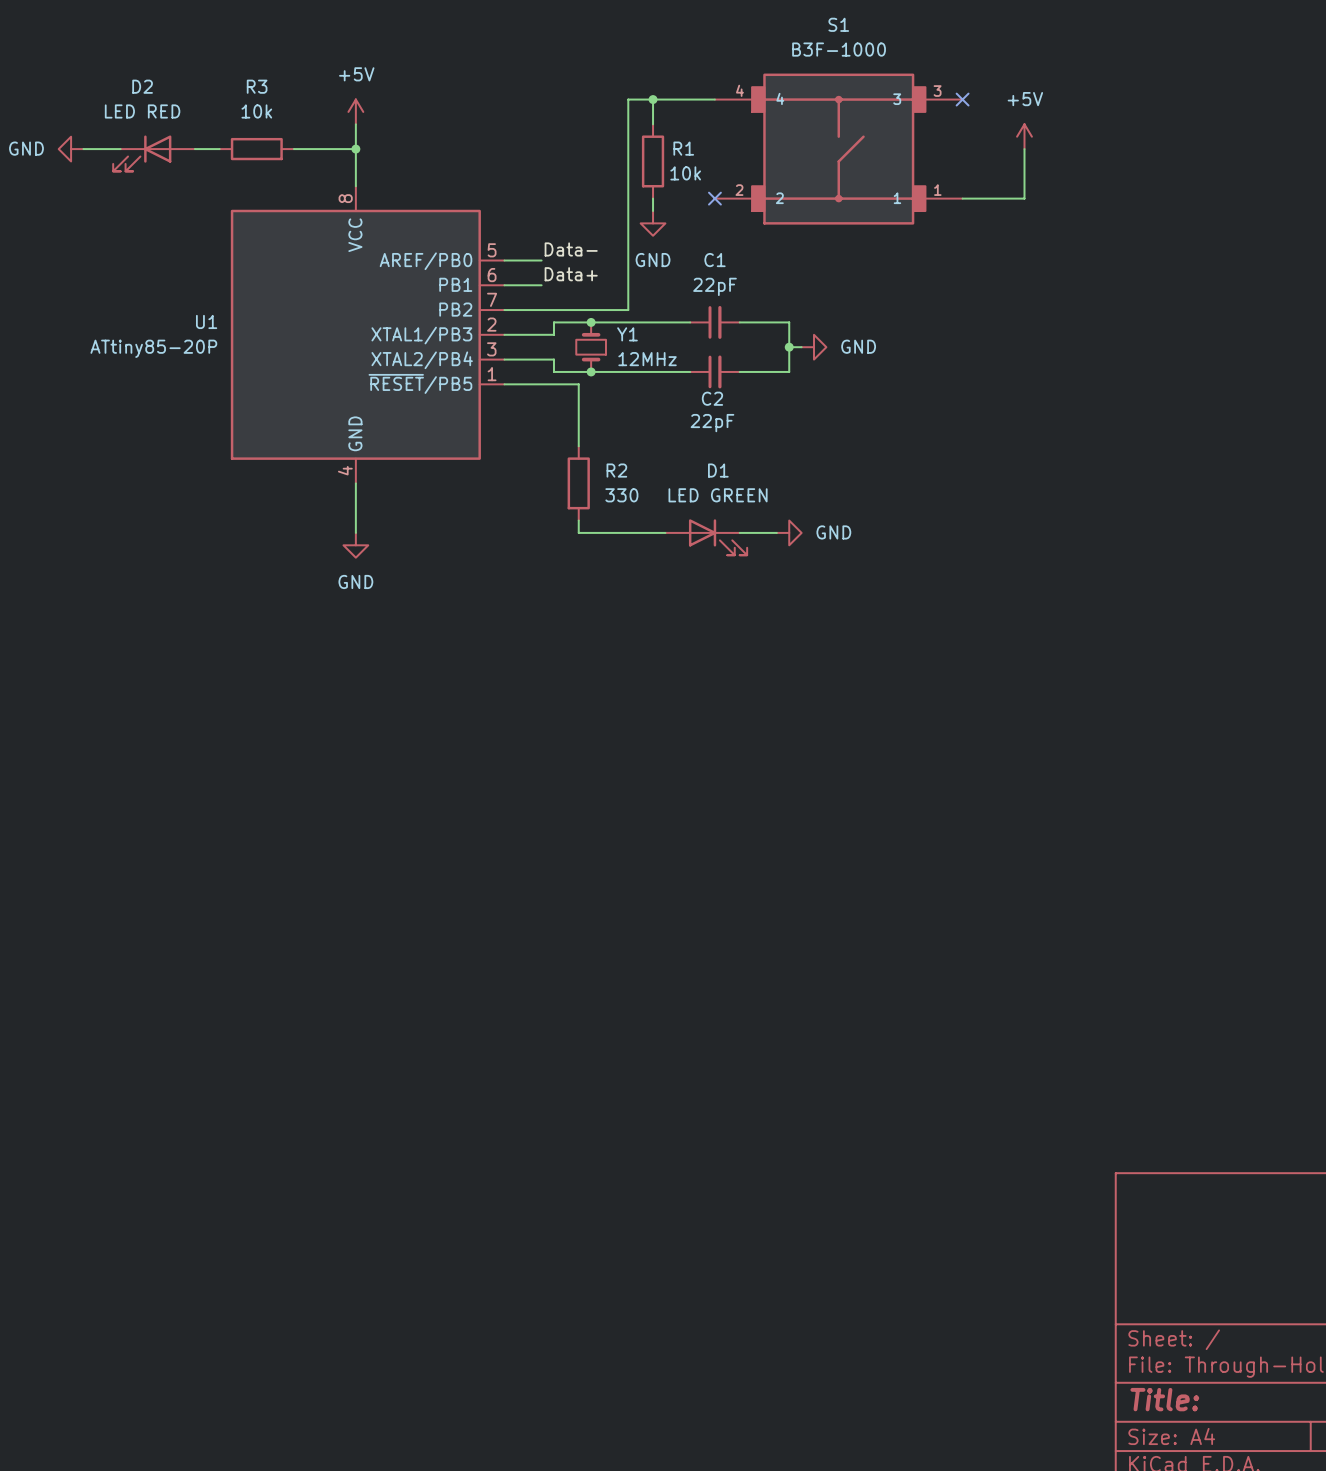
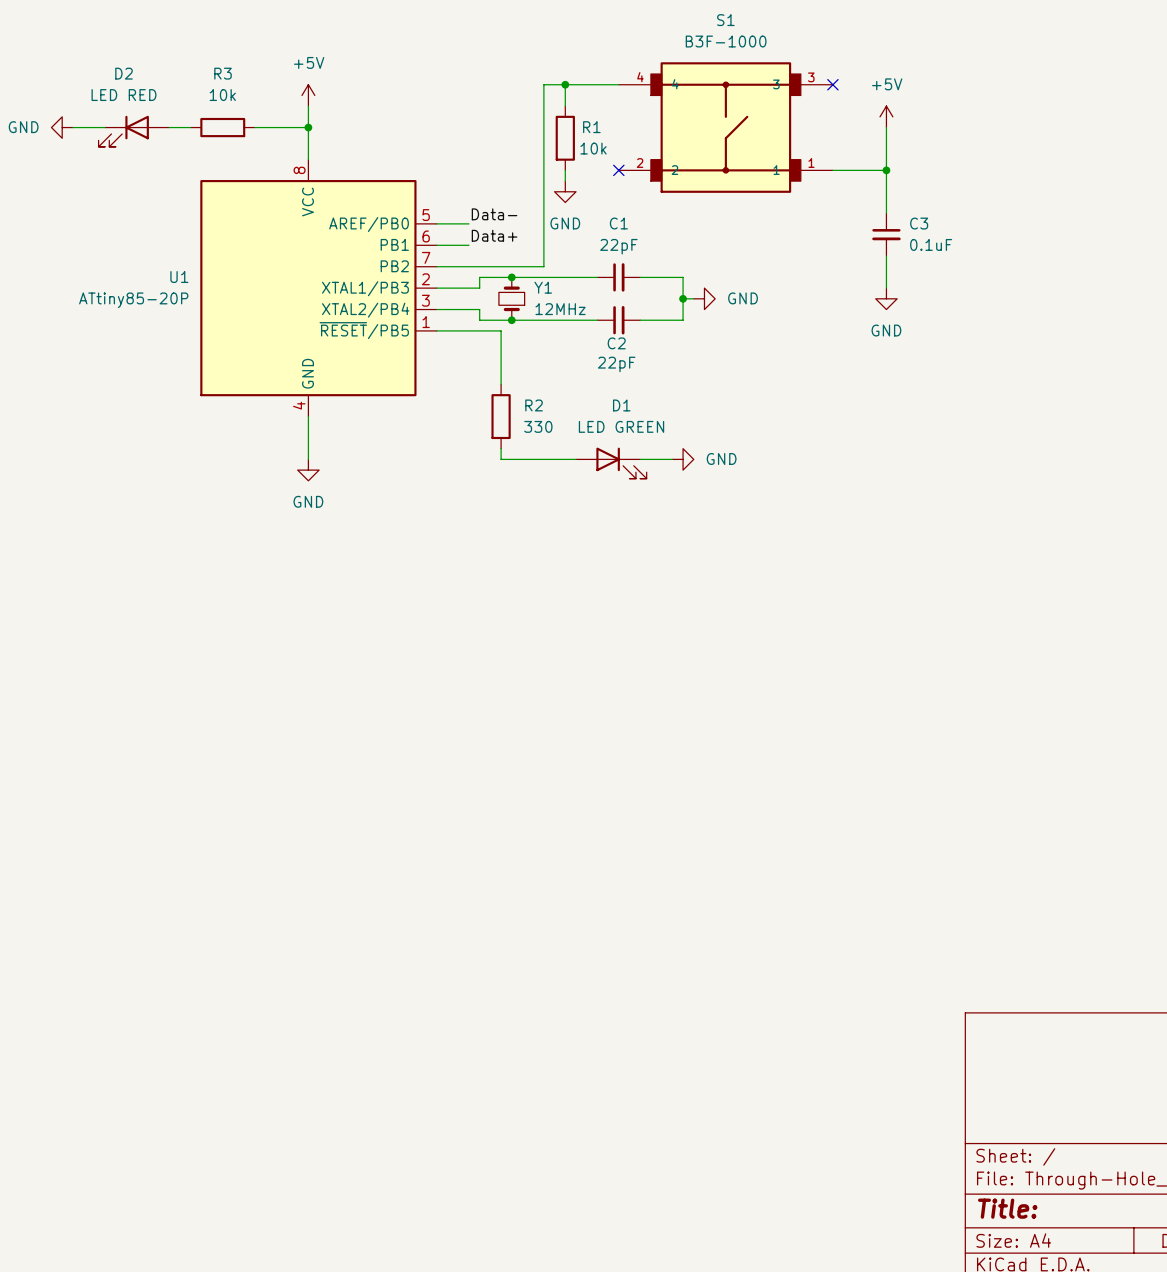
wire: none -> (886, 170) (886, 213)
junction: none -> (886, 170)
C3: none -> 0.1uF (886, 234)
wire: none -> (886, 256) (886, 288)
power symbol: none -> GND (886, 298)

